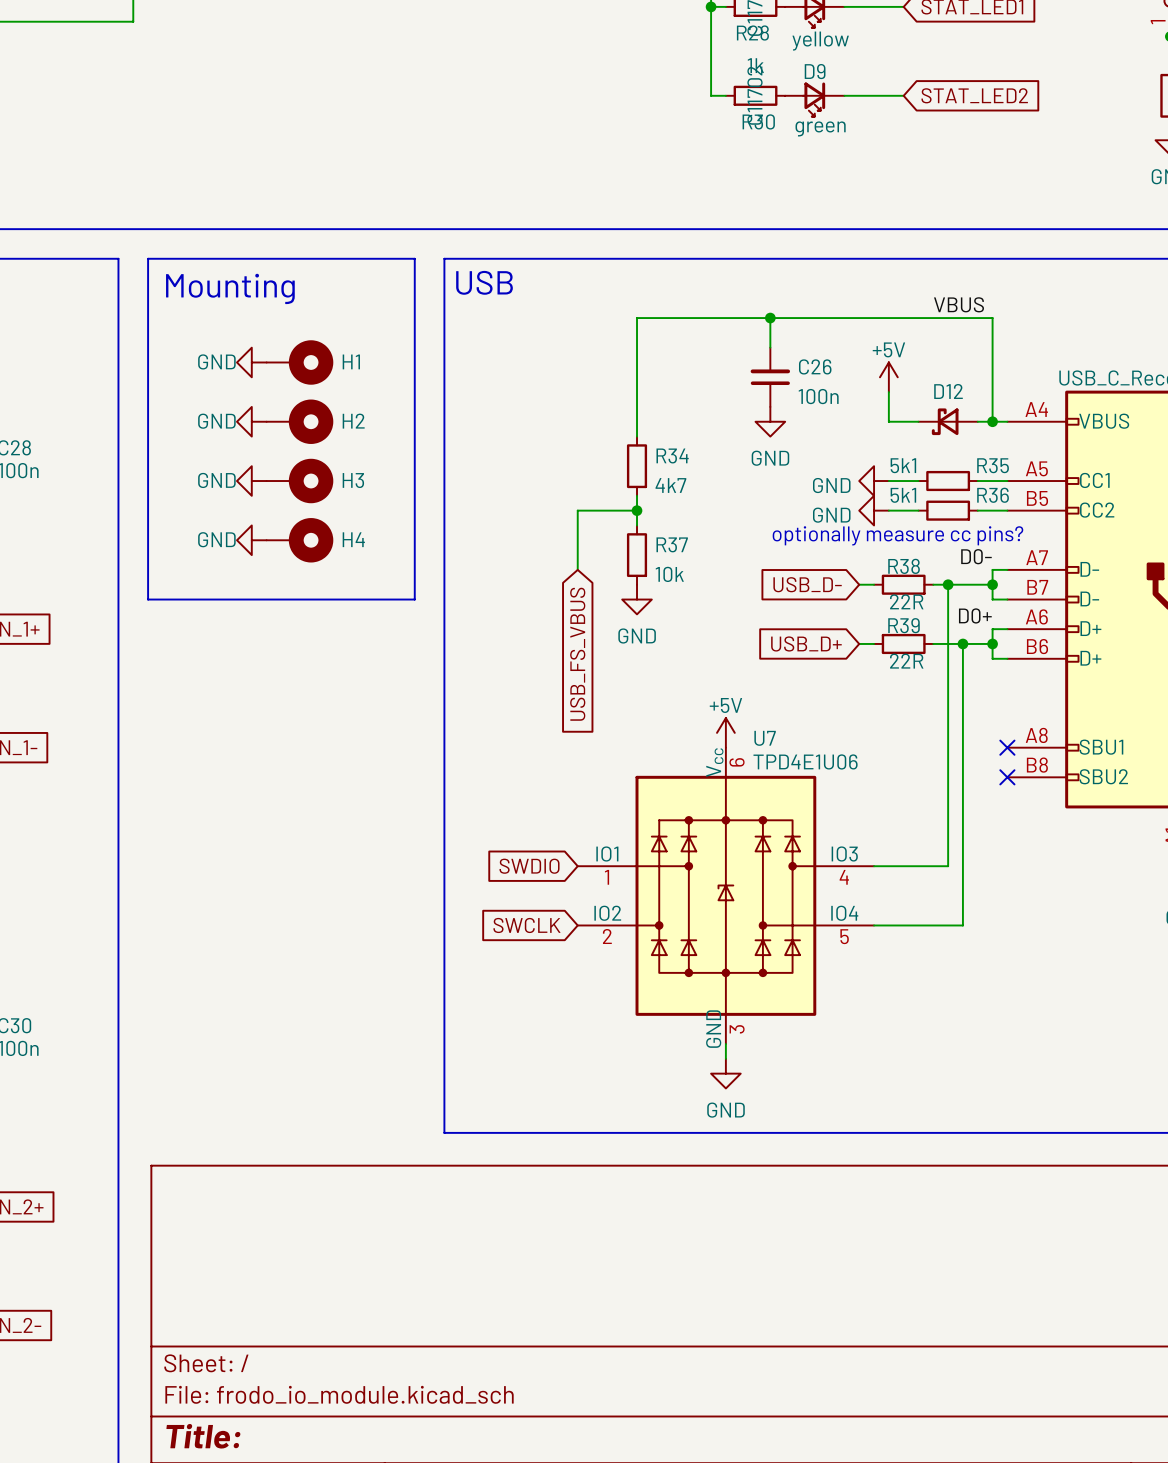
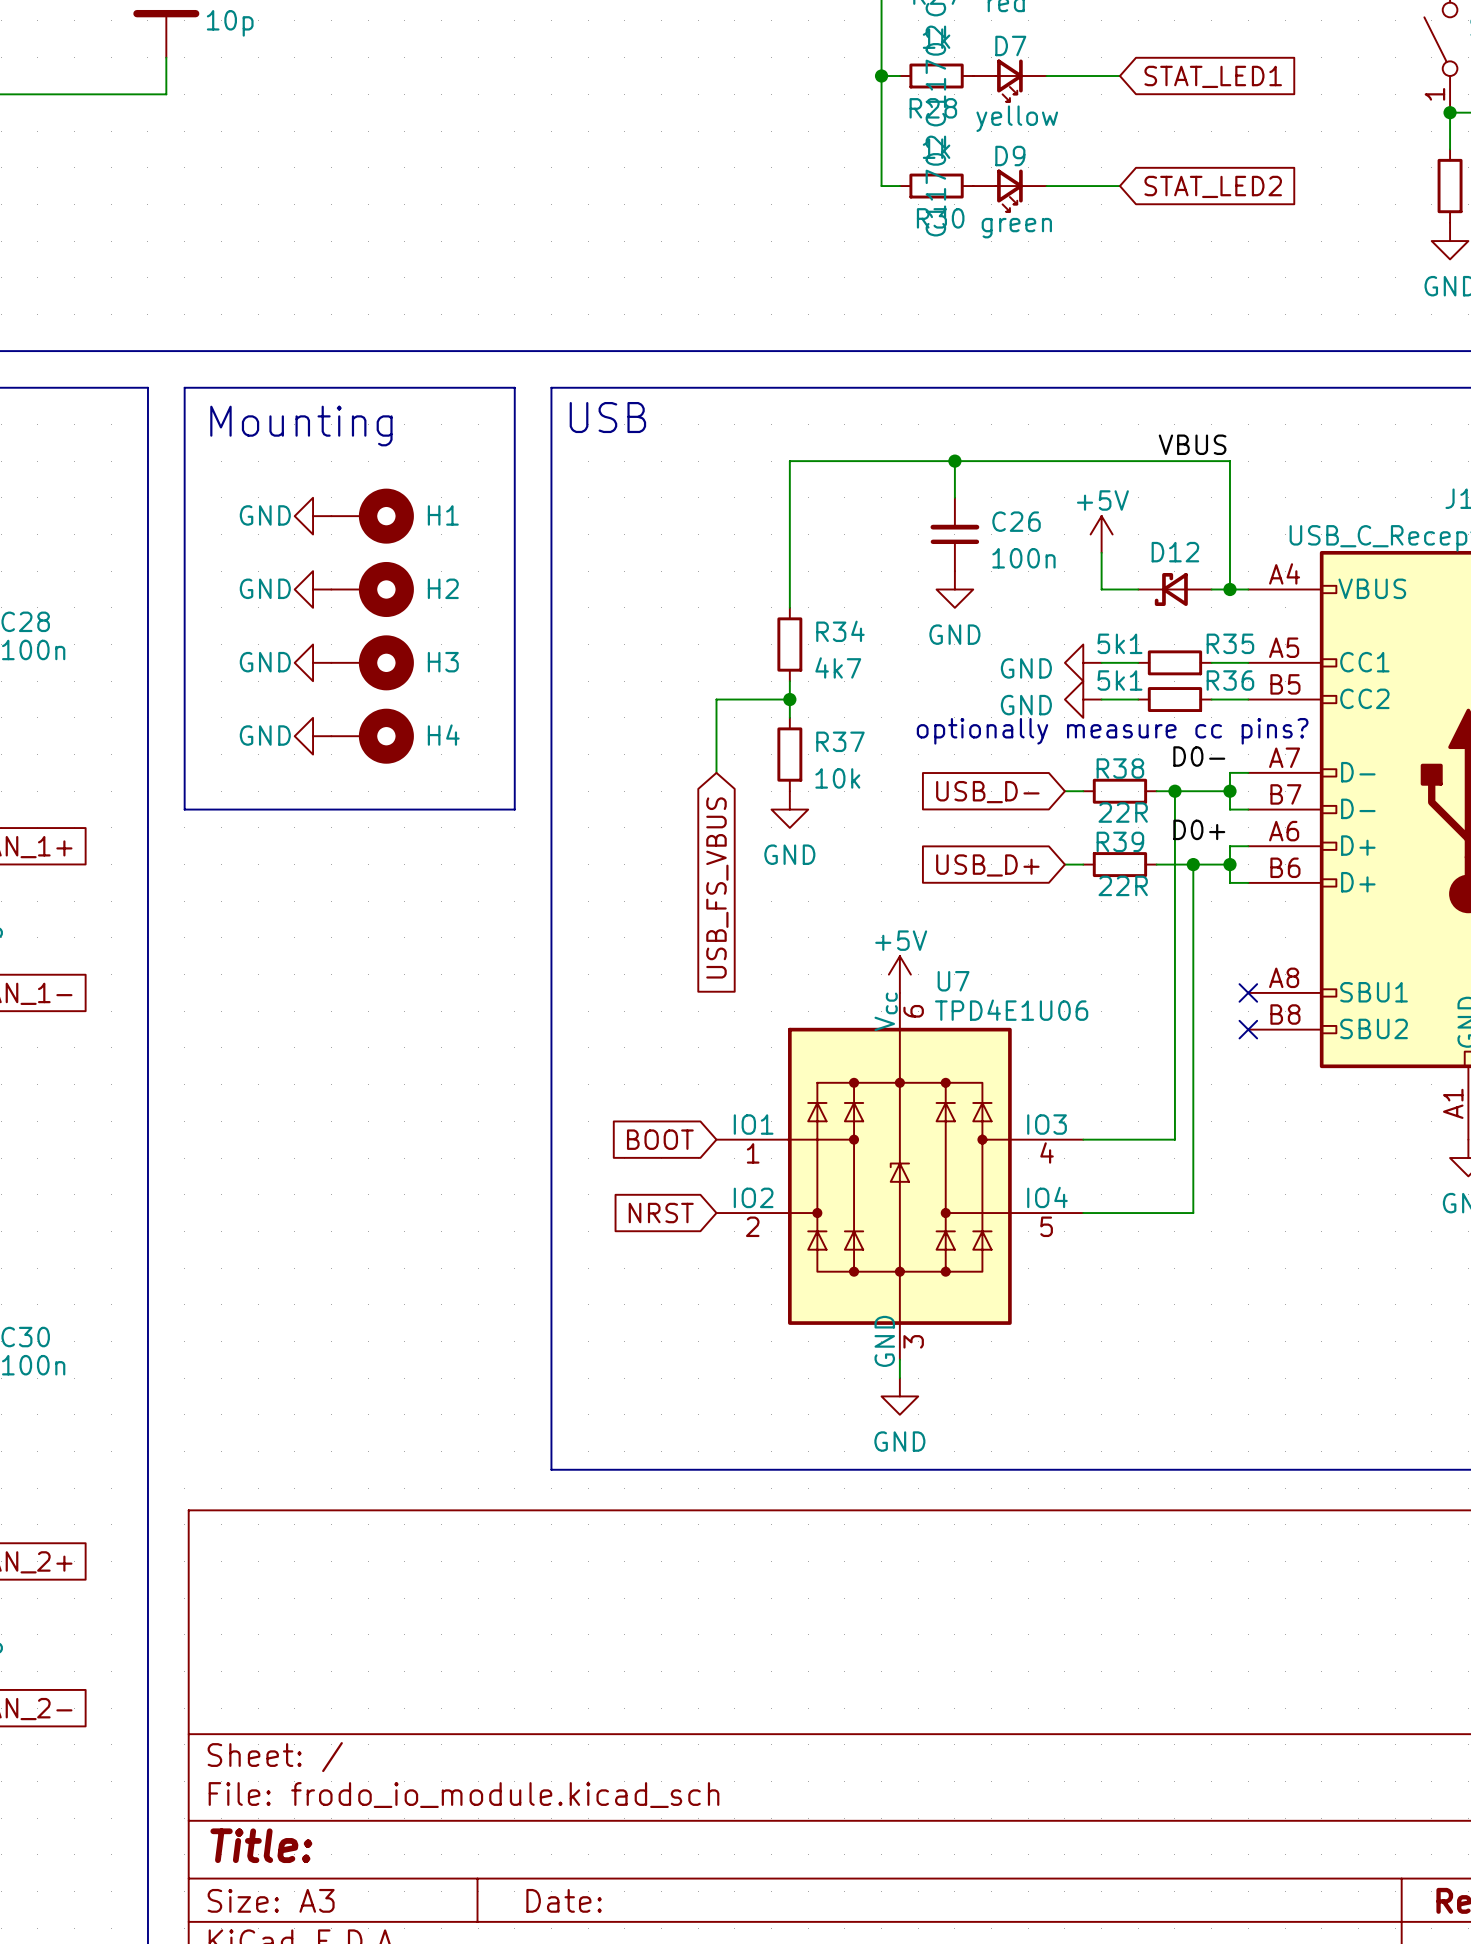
global label: SWDIO (529, 866) -> BOOT (660, 1139)
global label: SWCLK (526, 925) -> NRST (661, 1213)

